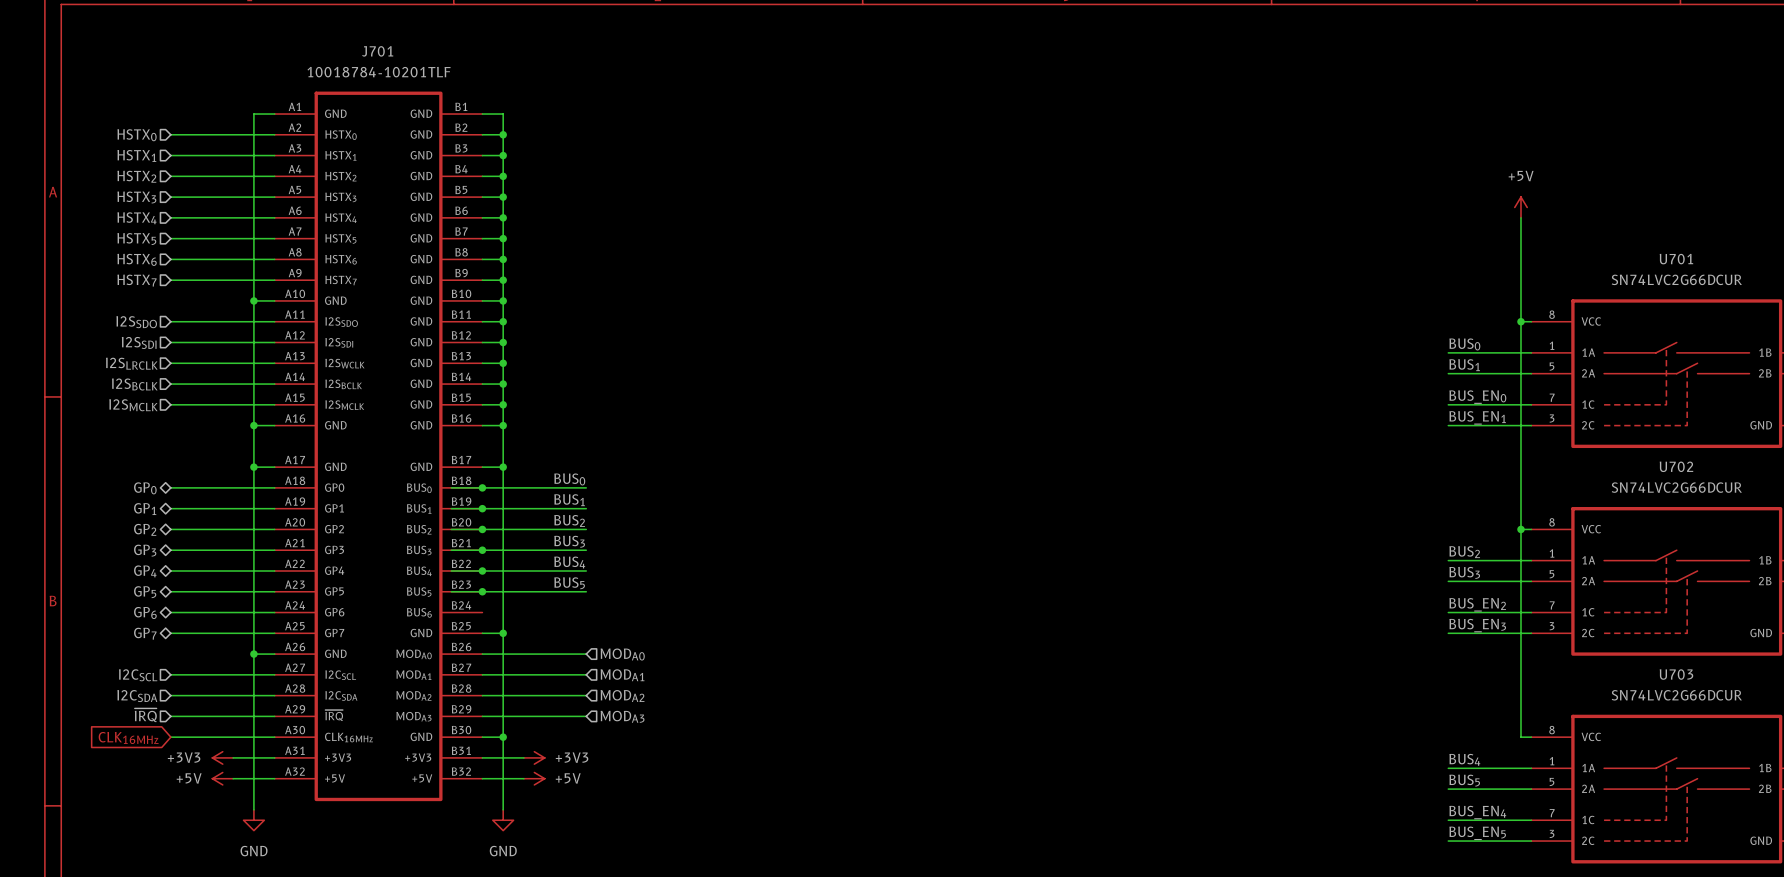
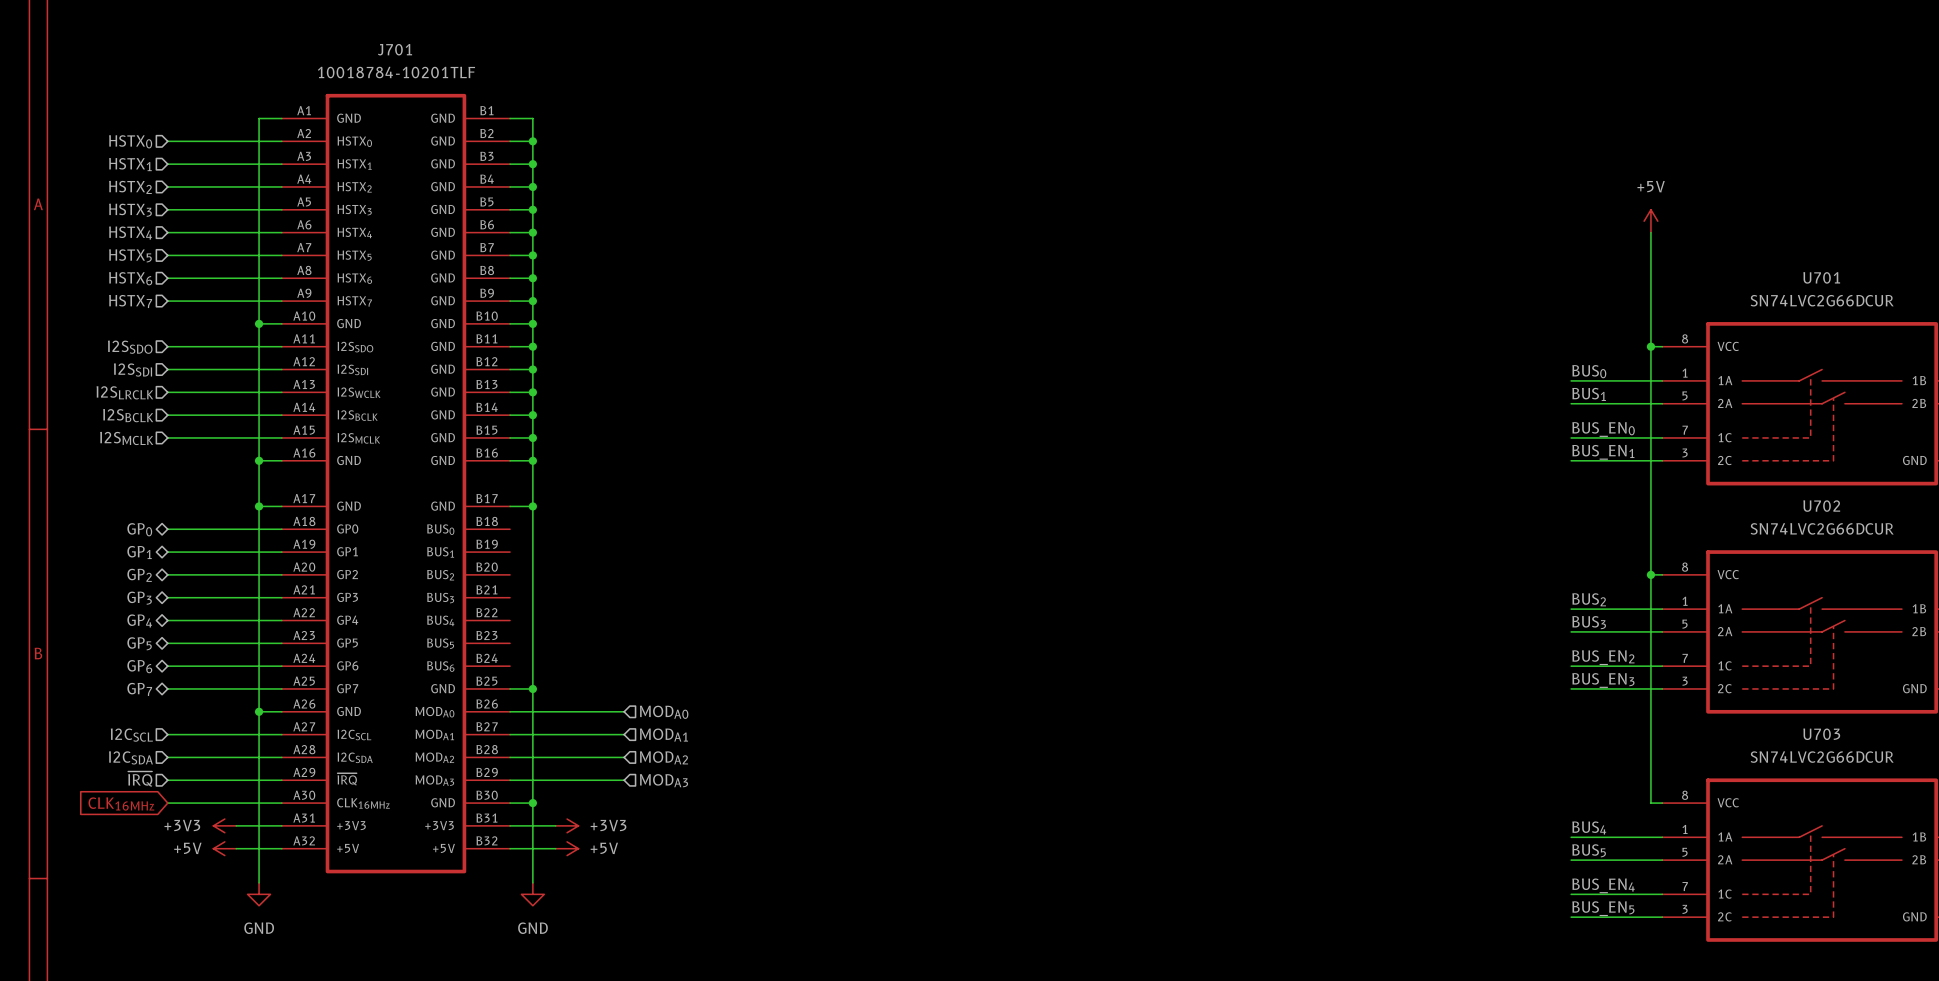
label: BUS0 (569, 479) -> none
wire: (451, 487) (586, 487) -> none
junction: (482, 487) -> none
label: BUS1 (569, 500) -> none
wire: (451, 508) (586, 508) -> none
junction: (482, 508) -> none
label: BUS2 (569, 520) -> none
wire: (451, 529) (586, 529) -> none
junction: (482, 529) -> none
label: BUS3 (569, 541) -> none
wire: (451, 550) (586, 550) -> none
junction: (482, 550) -> none
label: BUS4 (569, 562) -> none
wire: (451, 570) (586, 570) -> none
junction: (482, 570) -> none
label: BUS5 (569, 583) -> none
wire: (451, 591) (586, 591) -> none
junction: (482, 591) -> none

